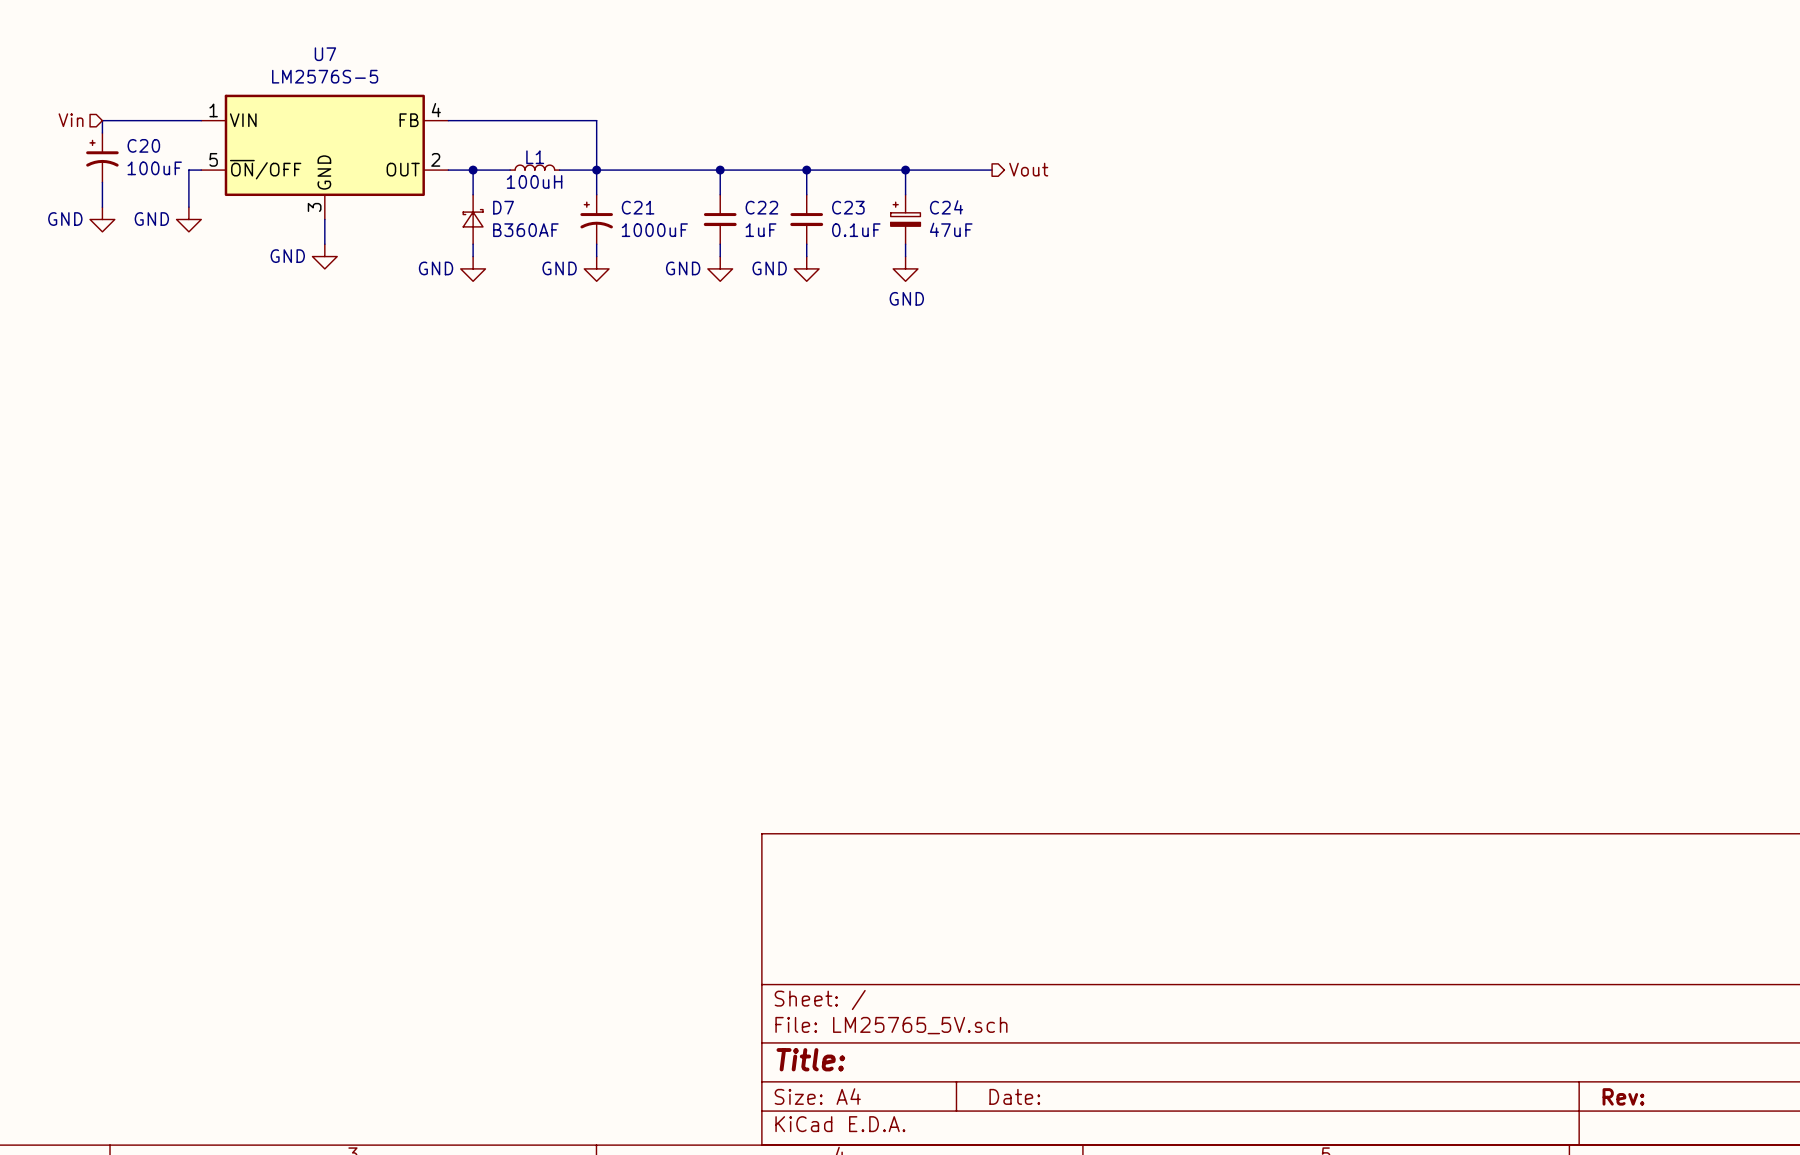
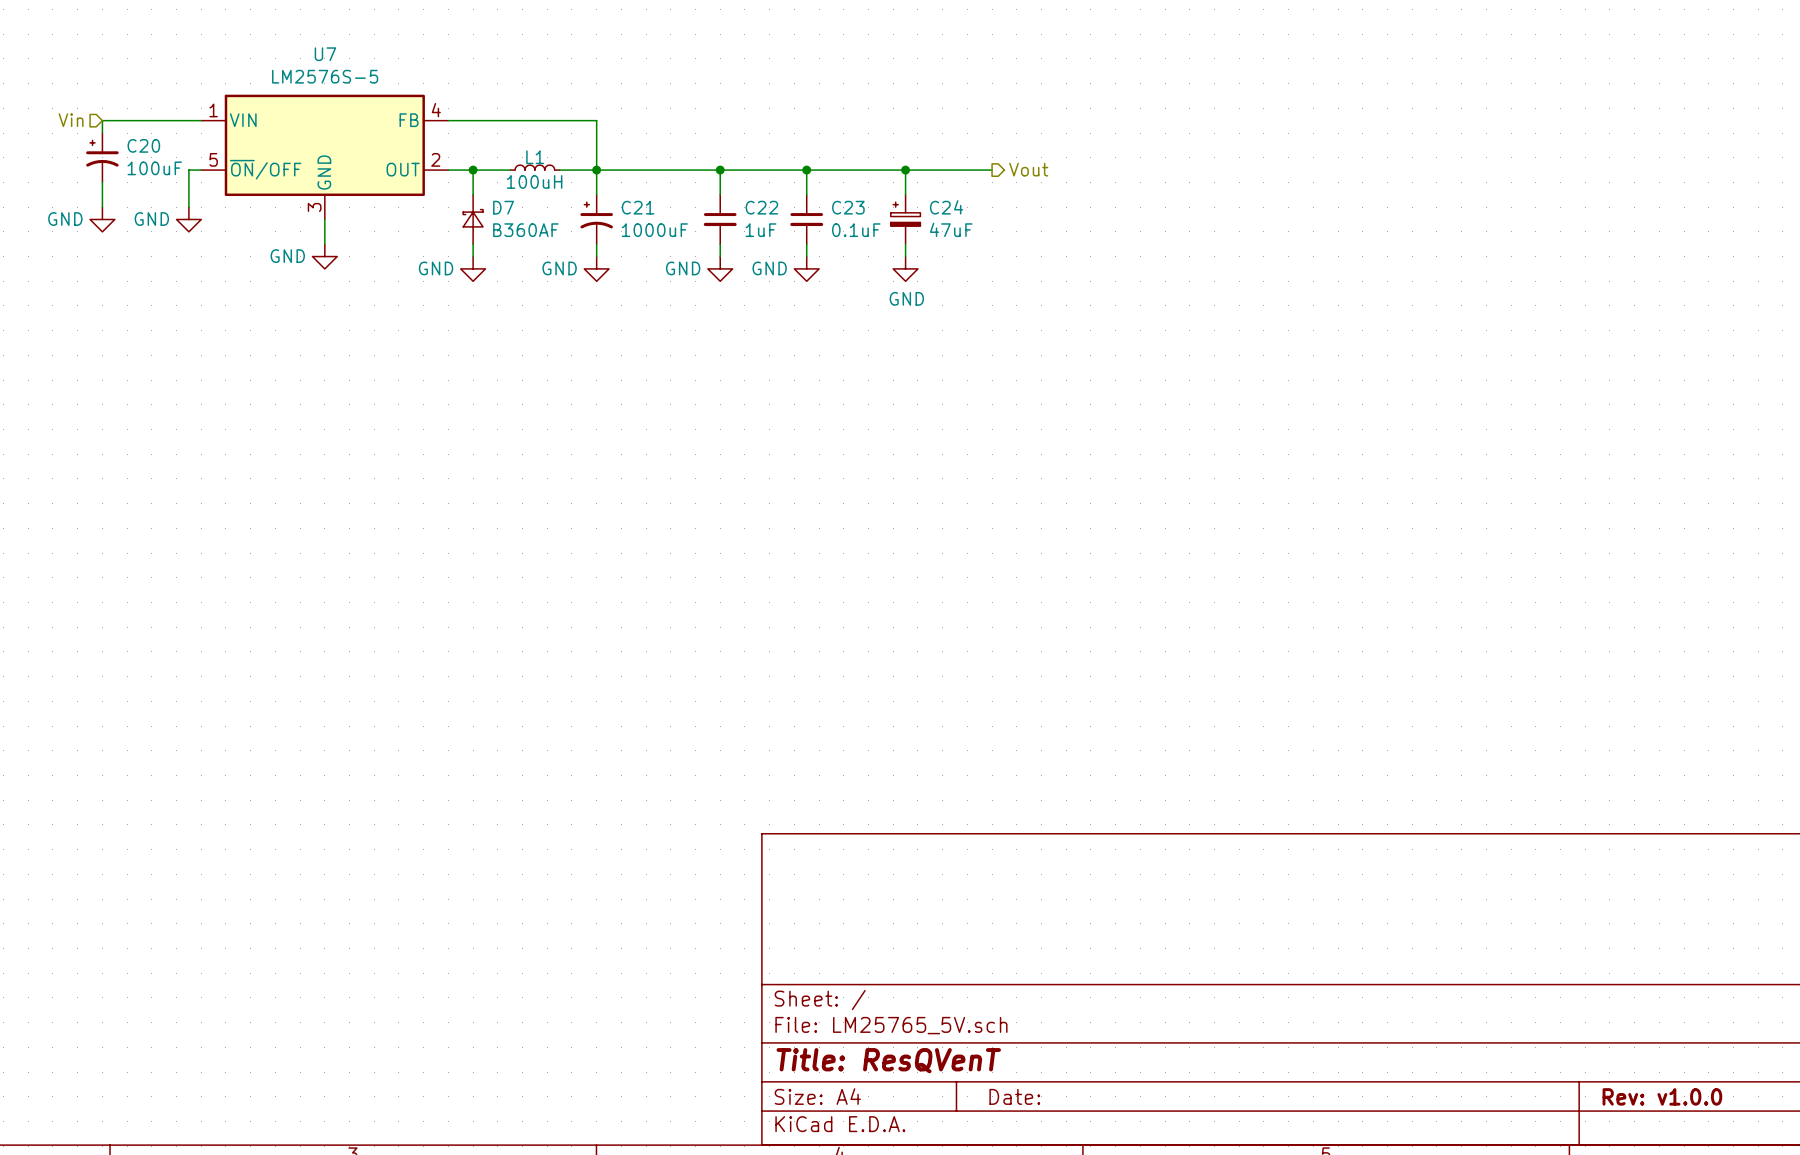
title block: Title: (810, 1059) -> Title: ResQVenT (888, 1060)
title block: Rev: (1623, 1096) -> Rev: v1.0.0 (1662, 1096)

